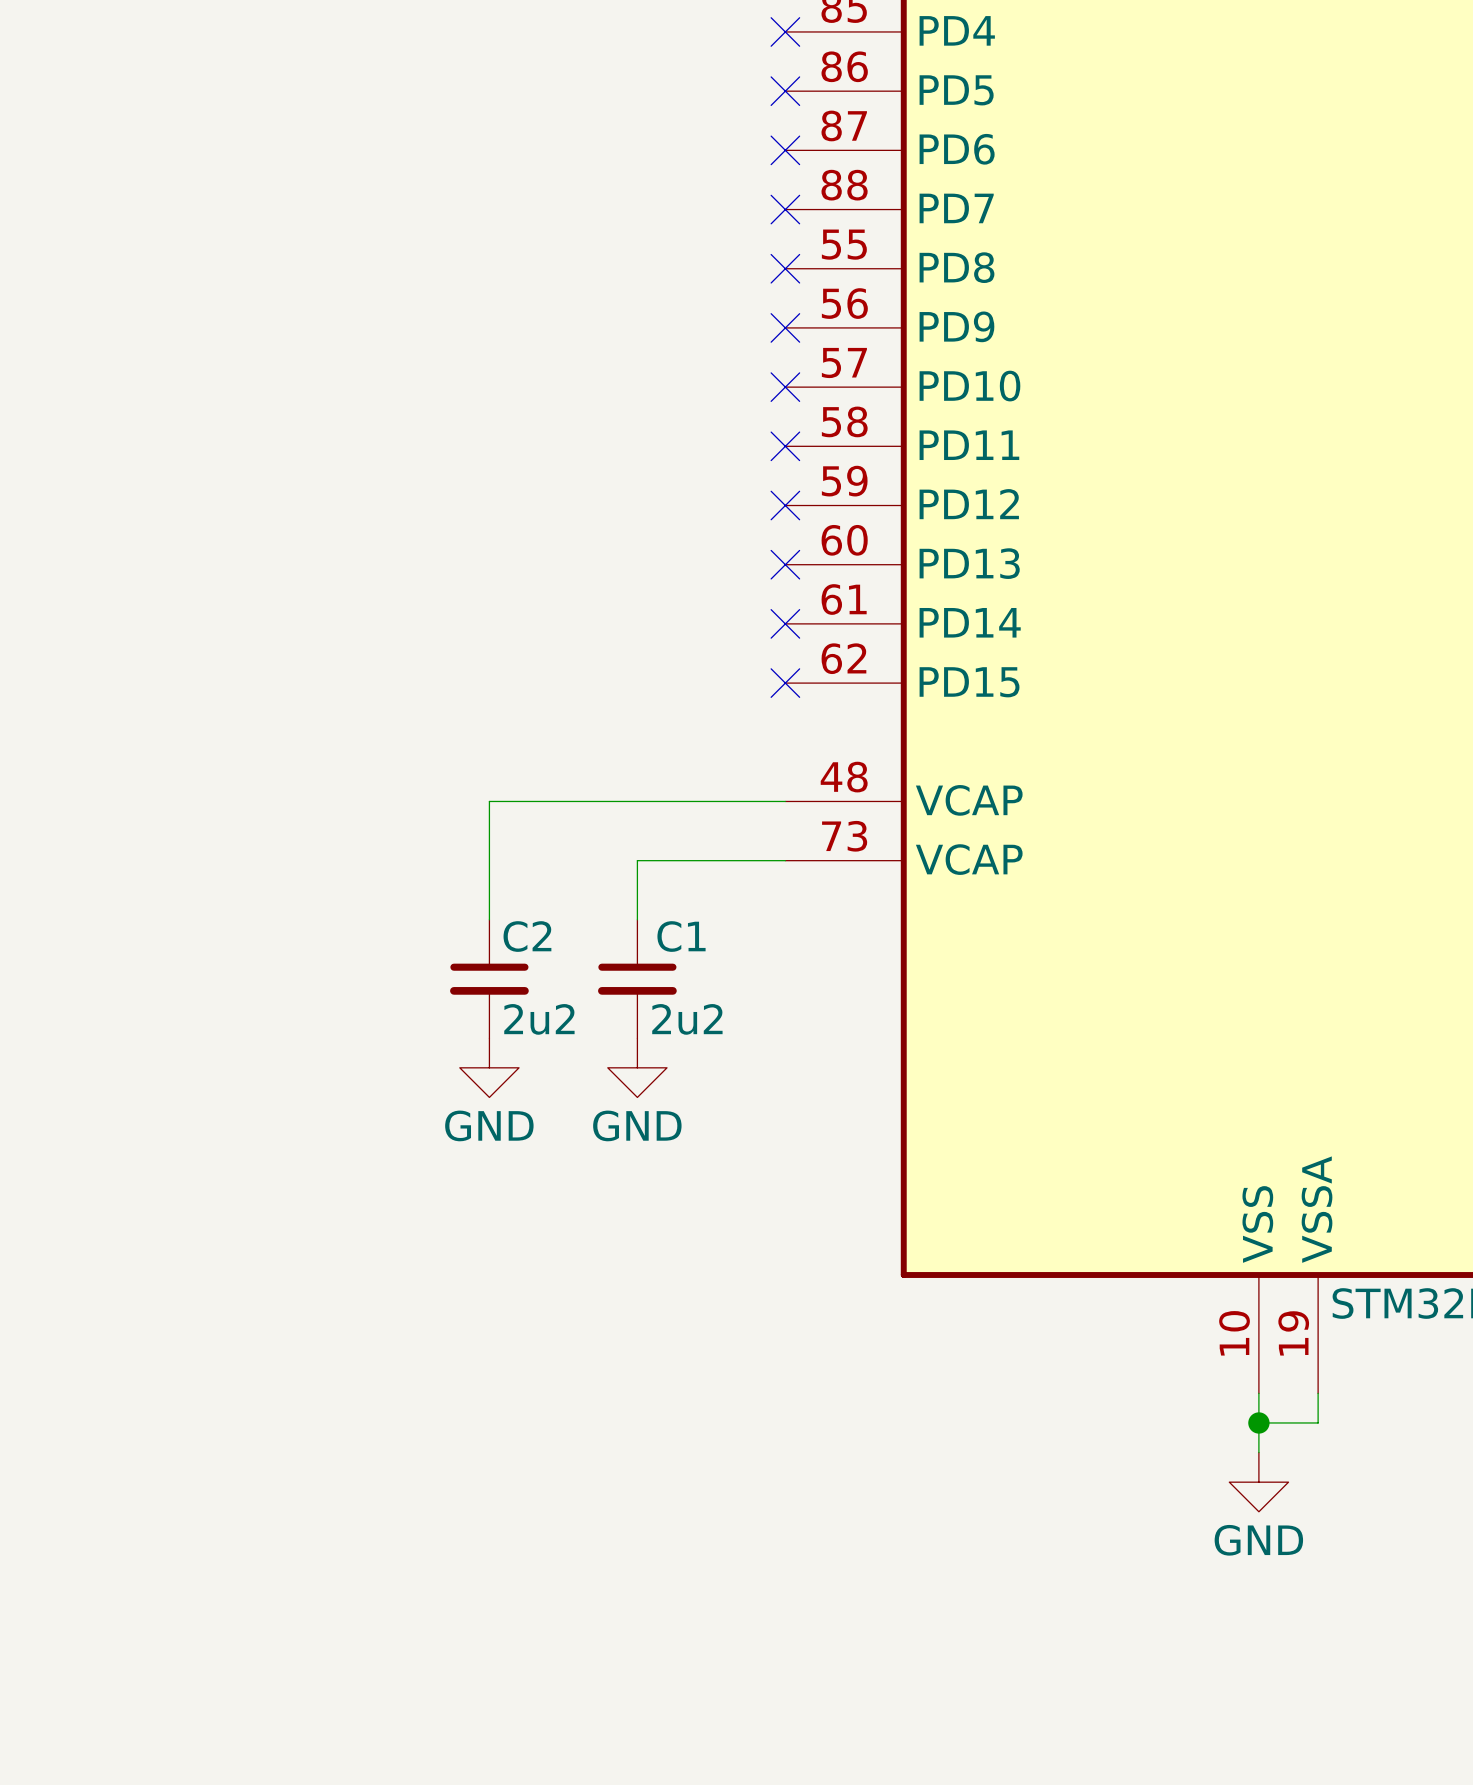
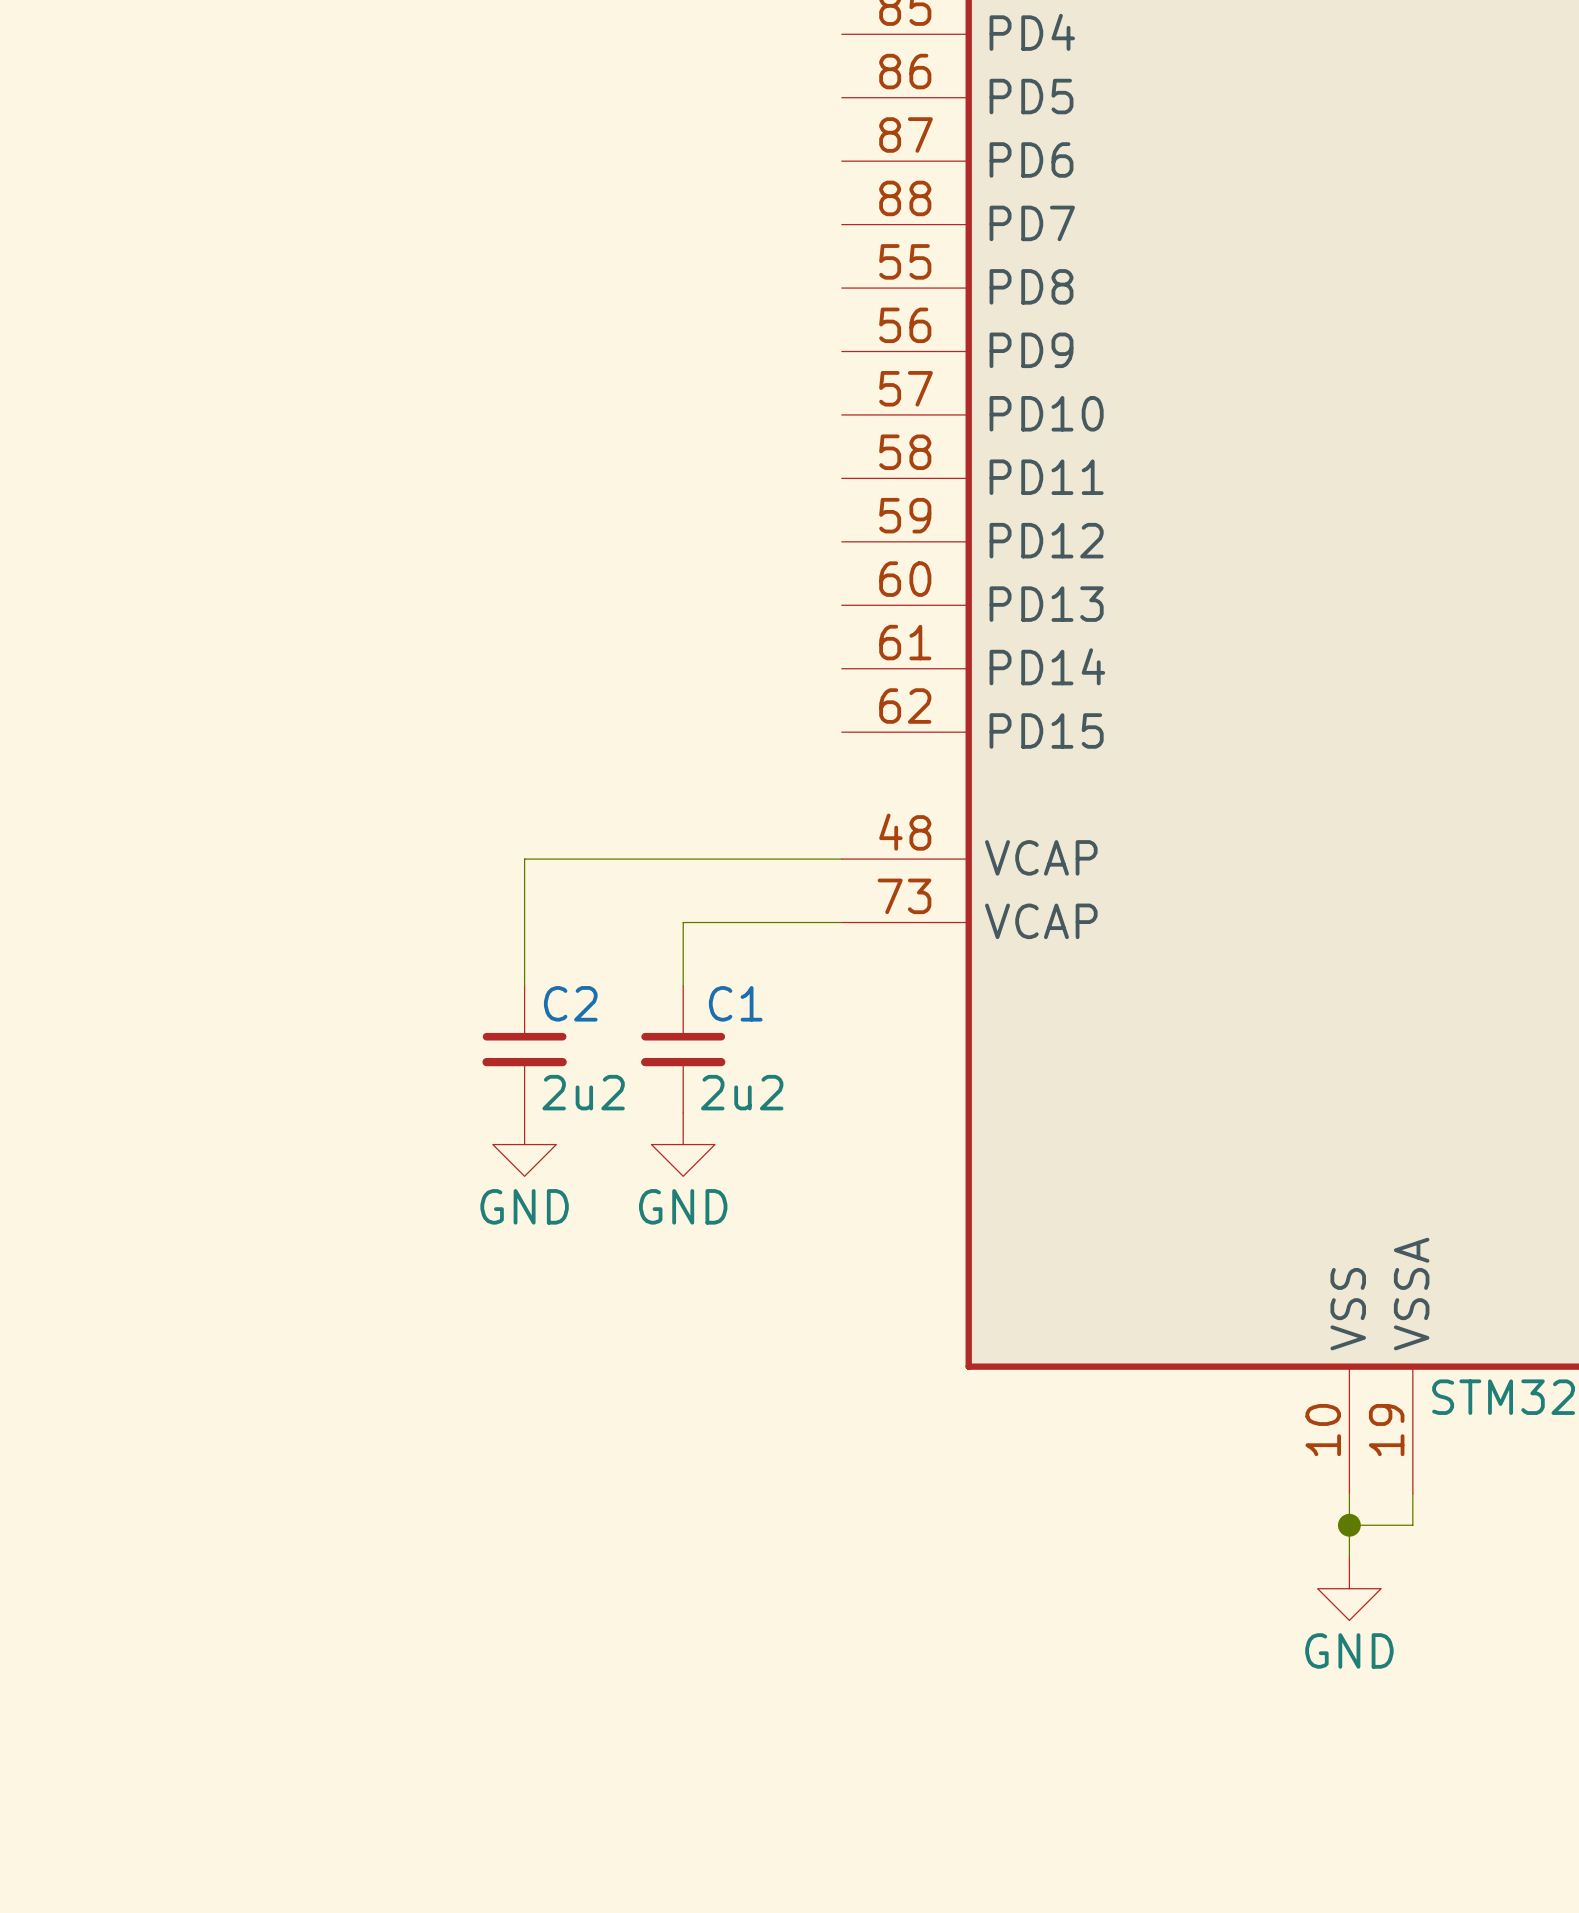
no-connect mark: (785, 31) -> none
no-connect mark: (785, 91) -> none
no-connect mark: (785, 150) -> none
no-connect mark: (785, 209) -> none
no-connect mark: (785, 268) -> none
no-connect mark: (785, 327) -> none
no-connect mark: (785, 387) -> none
no-connect mark: (785, 446) -> none
no-connect mark: (785, 505) -> none
no-connect mark: (785, 564) -> none
no-connect mark: (785, 623) -> none
no-connect mark: (785, 683) -> none

